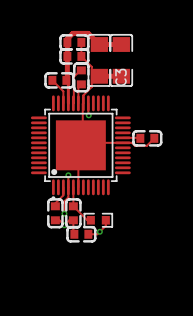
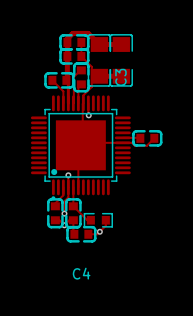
C4 name: none -> C4 (81, 273)

